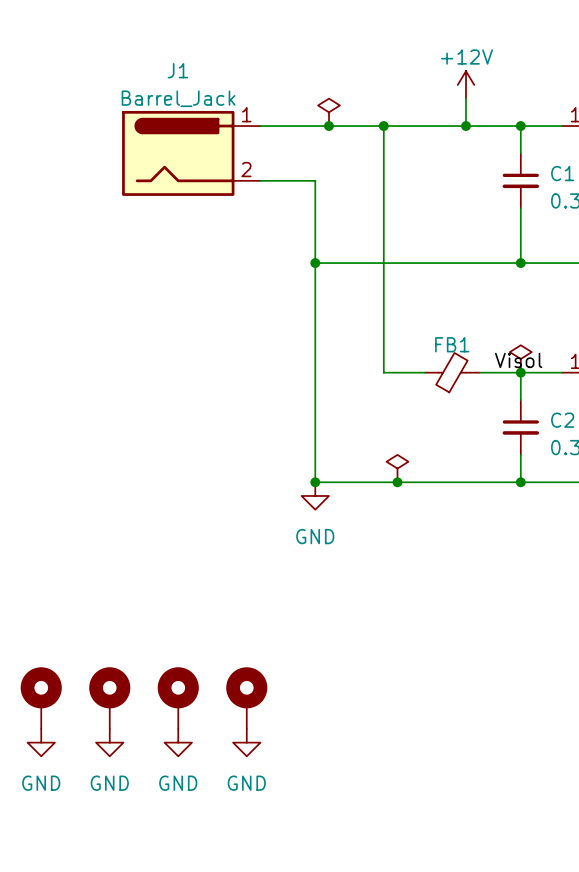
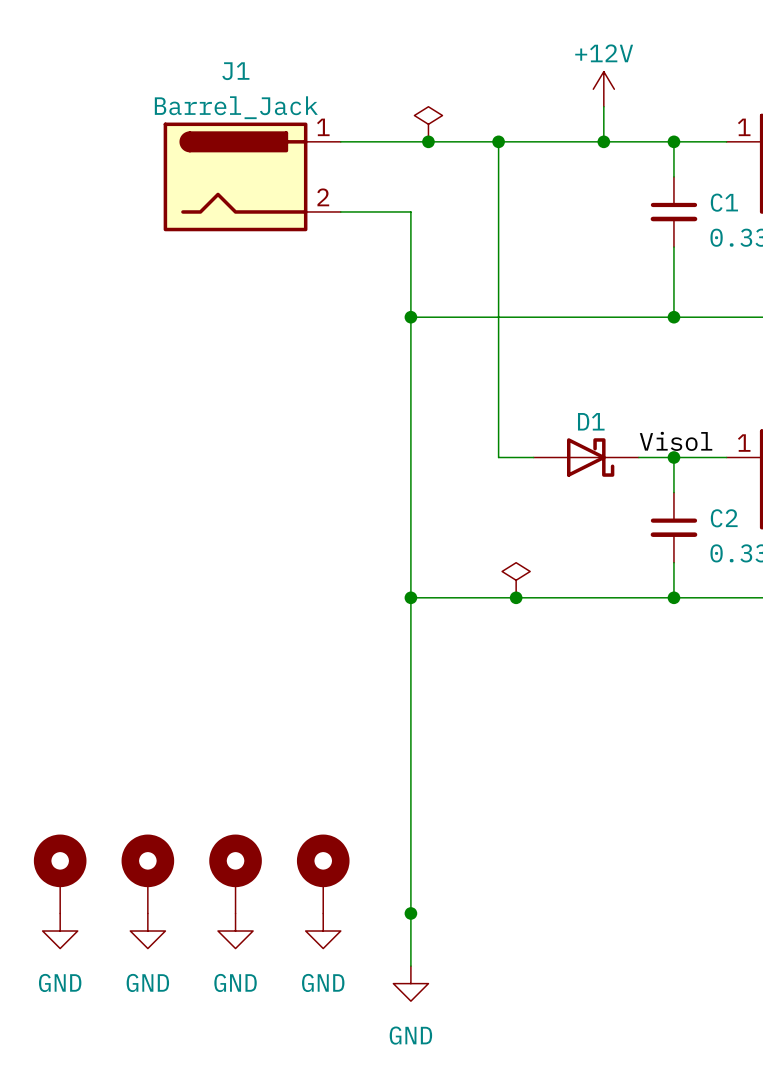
power symbol: (520, 358) -> none
FB1: (452, 372) -> none
D1: none -> (586, 457)
wire: none -> (410, 597) (410, 966)
power symbol: GND (315, 495) -> none
junction: none -> (410, 913)
power symbol: none -> GND (410, 983)

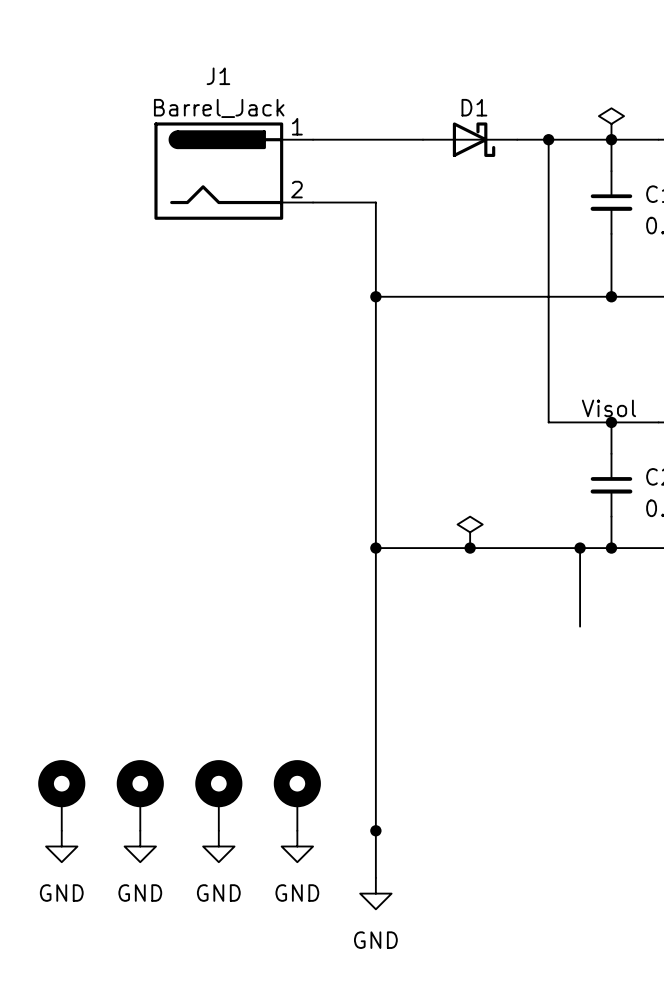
power symbol: +12V (603, 89) -> none
wire: (603, 106) (603, 141) -> (580, 422) (548, 422) (548, 139)
power symbol position: (428, 124) -> (611, 123)
junction: (428, 141) -> none
wire: (498, 141) (498, 457) (533, 457) -> none
junction: (498, 141) -> none
D1 position: (586, 457) -> (470, 139)
wire: none -> (580, 548) (580, 626)
junction: none -> (580, 548)

